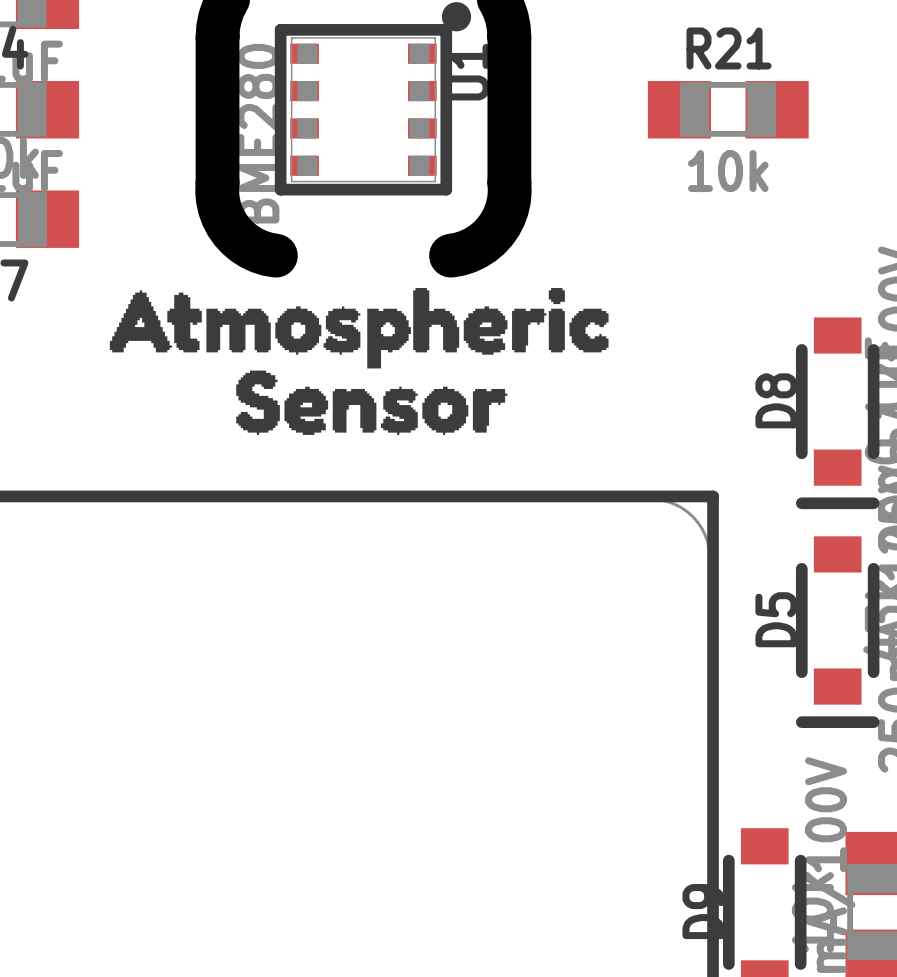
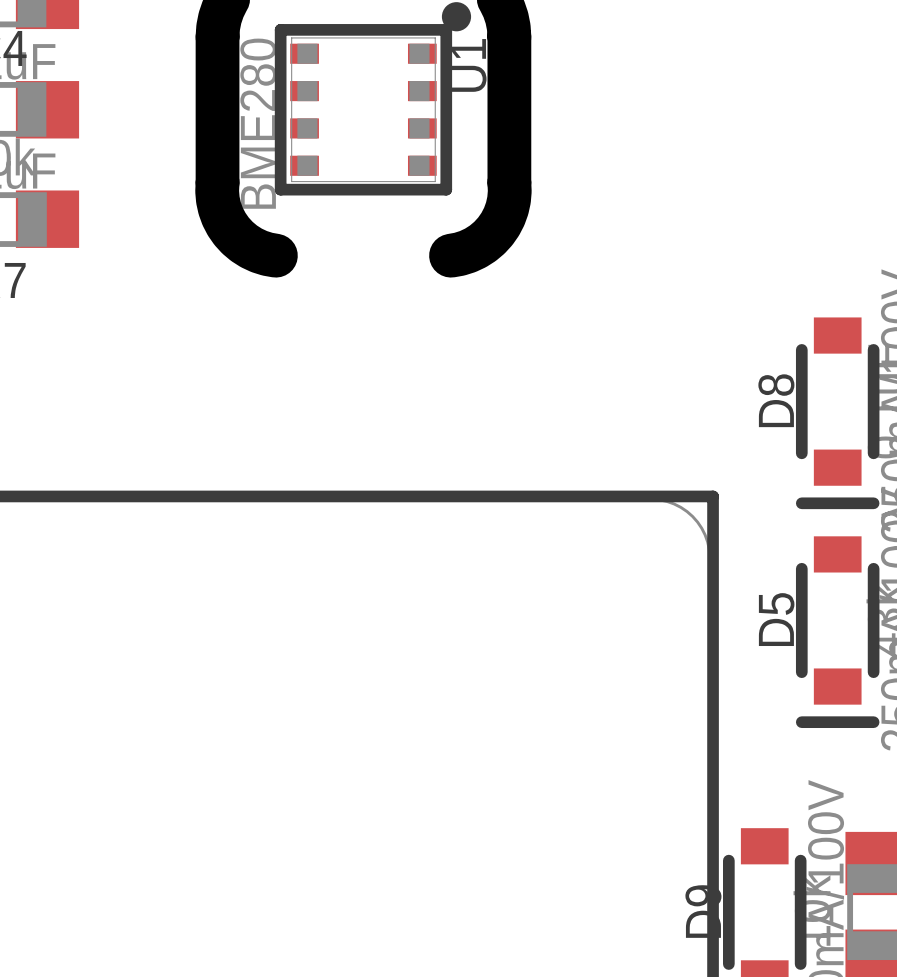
R21: 10k (728, 109) -> none
drawing: [109, 288, 609, 435] -> none

